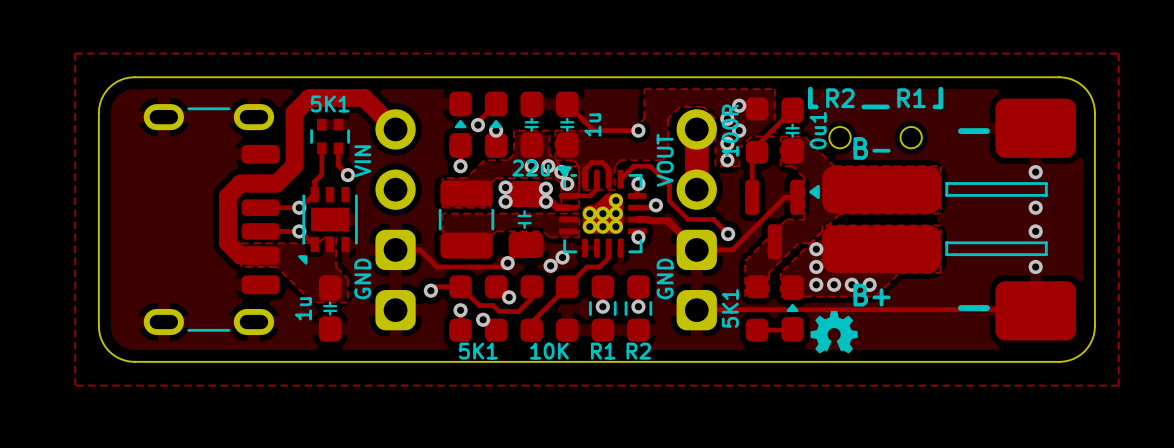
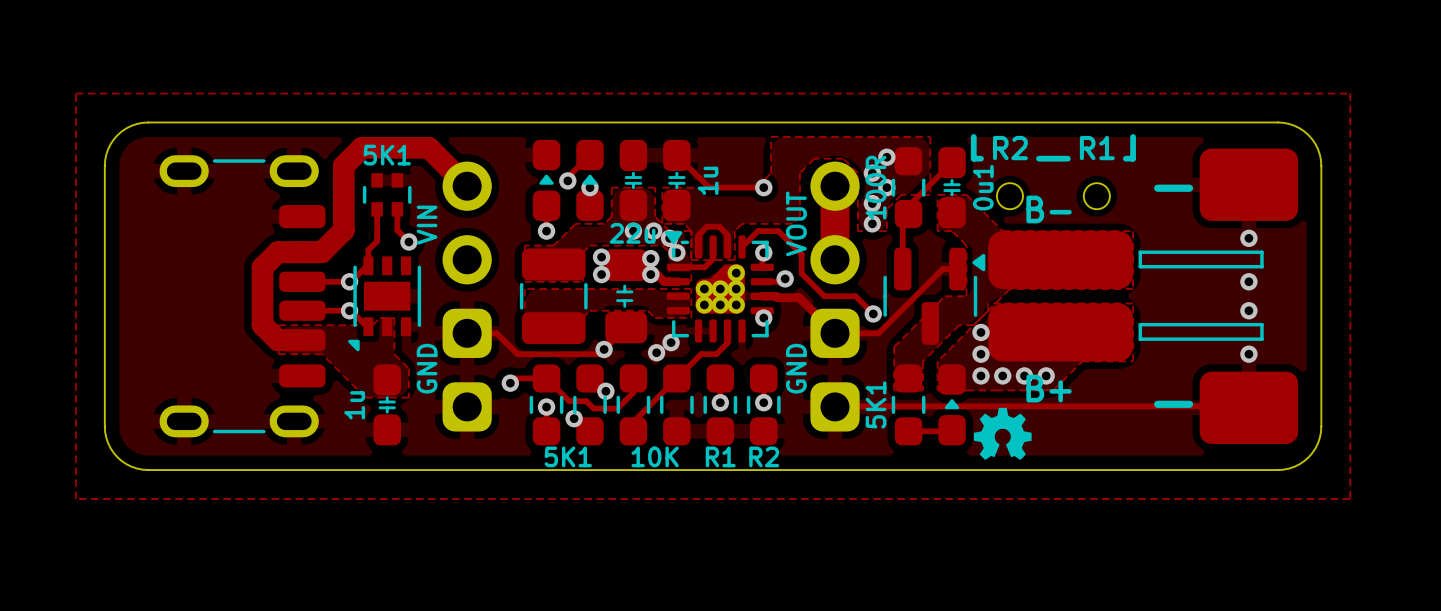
part footprint: [745, 97, 769, 164] -> [891, 147, 926, 229]
part footprint: [745, 179, 820, 260] -> [883, 247, 986, 345]
part footprint: [449, 275, 472, 342] -> [529, 364, 564, 446]
part footprint: [484, 275, 508, 342] -> [573, 364, 607, 446]
part footprint: [520, 275, 543, 342] -> [616, 364, 651, 446]
part footprint: [556, 275, 579, 342] -> [660, 364, 694, 446]
part footprint: [745, 275, 769, 342] -> [891, 364, 926, 446]

